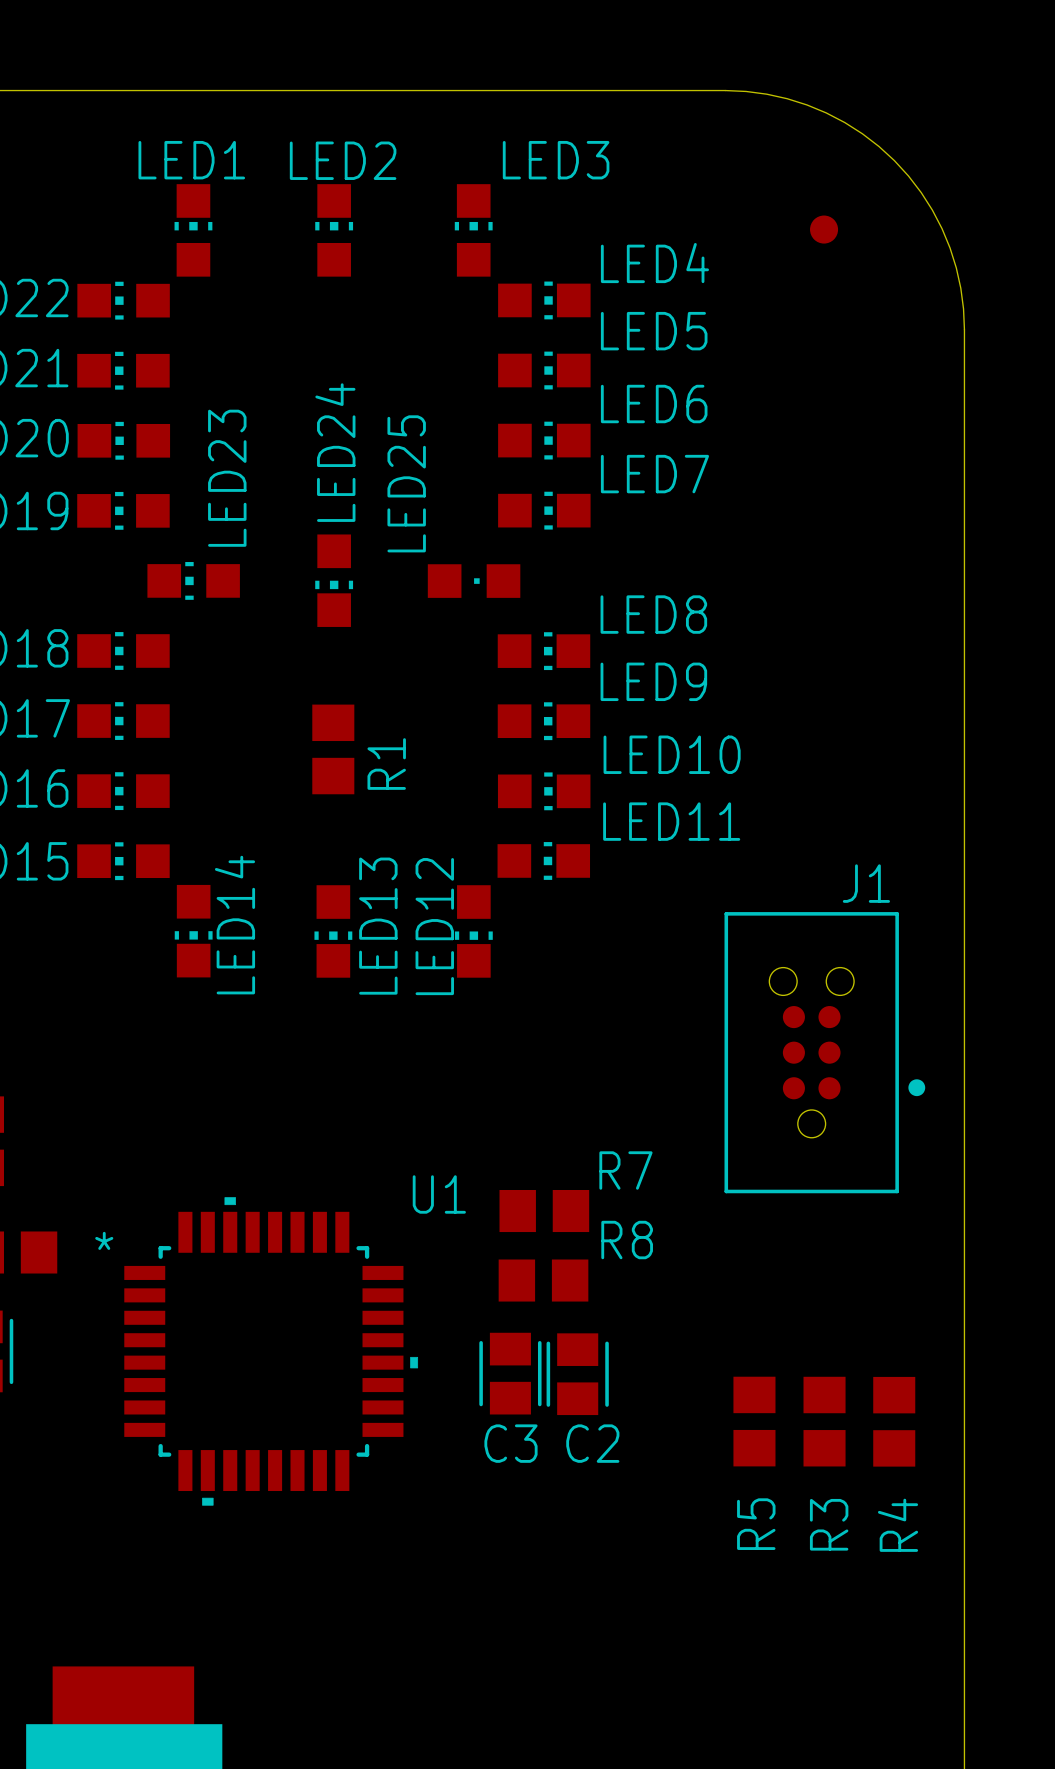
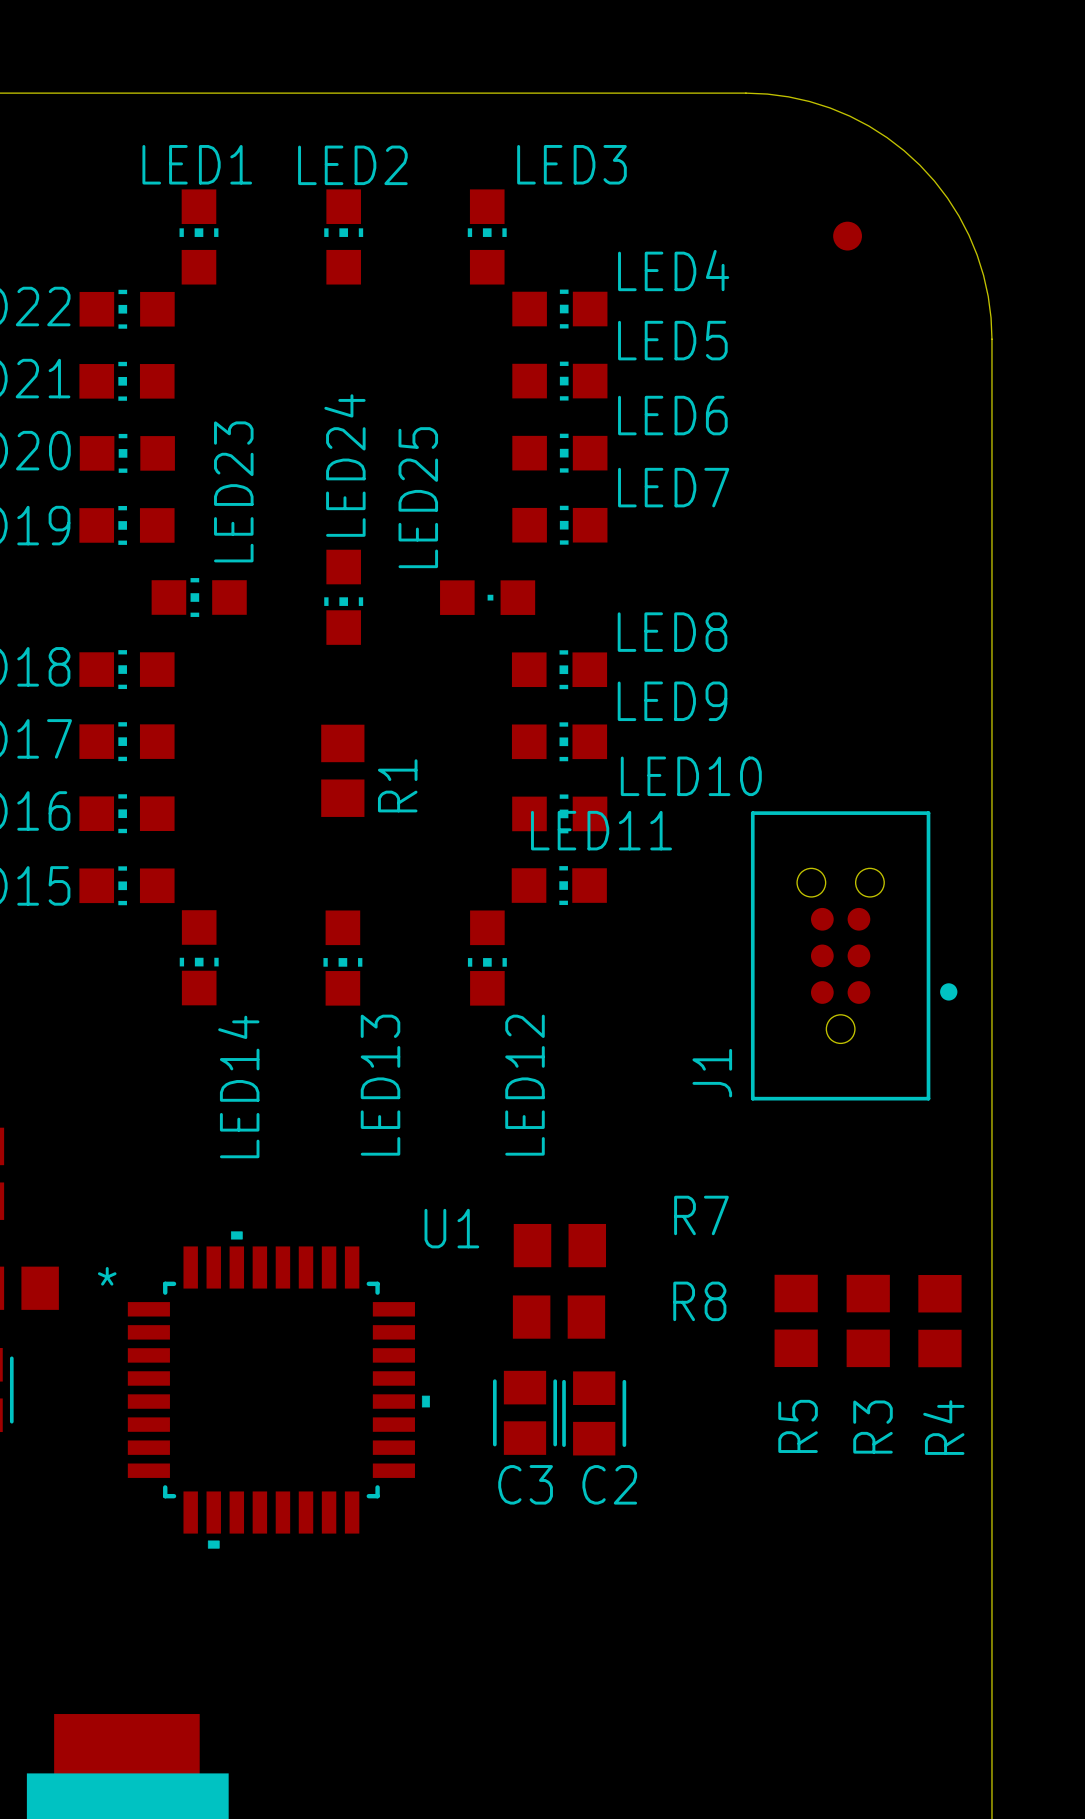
LED11 name position: LED11 (671, 821) -> LED11 (601, 830)
J1 name rotation: 0° (866, 883) -> 90° counterclockwise (712, 1073)
J1 name position: J1 (866, 883) -> J1 (712, 1073)
LED14 name position: LED14 (235, 925) -> LED14 (238, 1086)
LED13 name position: LED13 (378, 926) -> LED13 (380, 1085)
LED12 name position: LED12 (434, 926) -> LED12 (525, 1085)
J1 position: (824, 1052) -> (854, 955)
R7 name position: R7 (625, 1170) -> R7 (701, 1215)
R8 name position: R8 (627, 1240) -> R8 (699, 1301)
R5 position: (754, 1421) -> (796, 1320)
R3 position: (824, 1421) -> (868, 1320)
R4 position: (894, 1421) -> (939, 1321)

